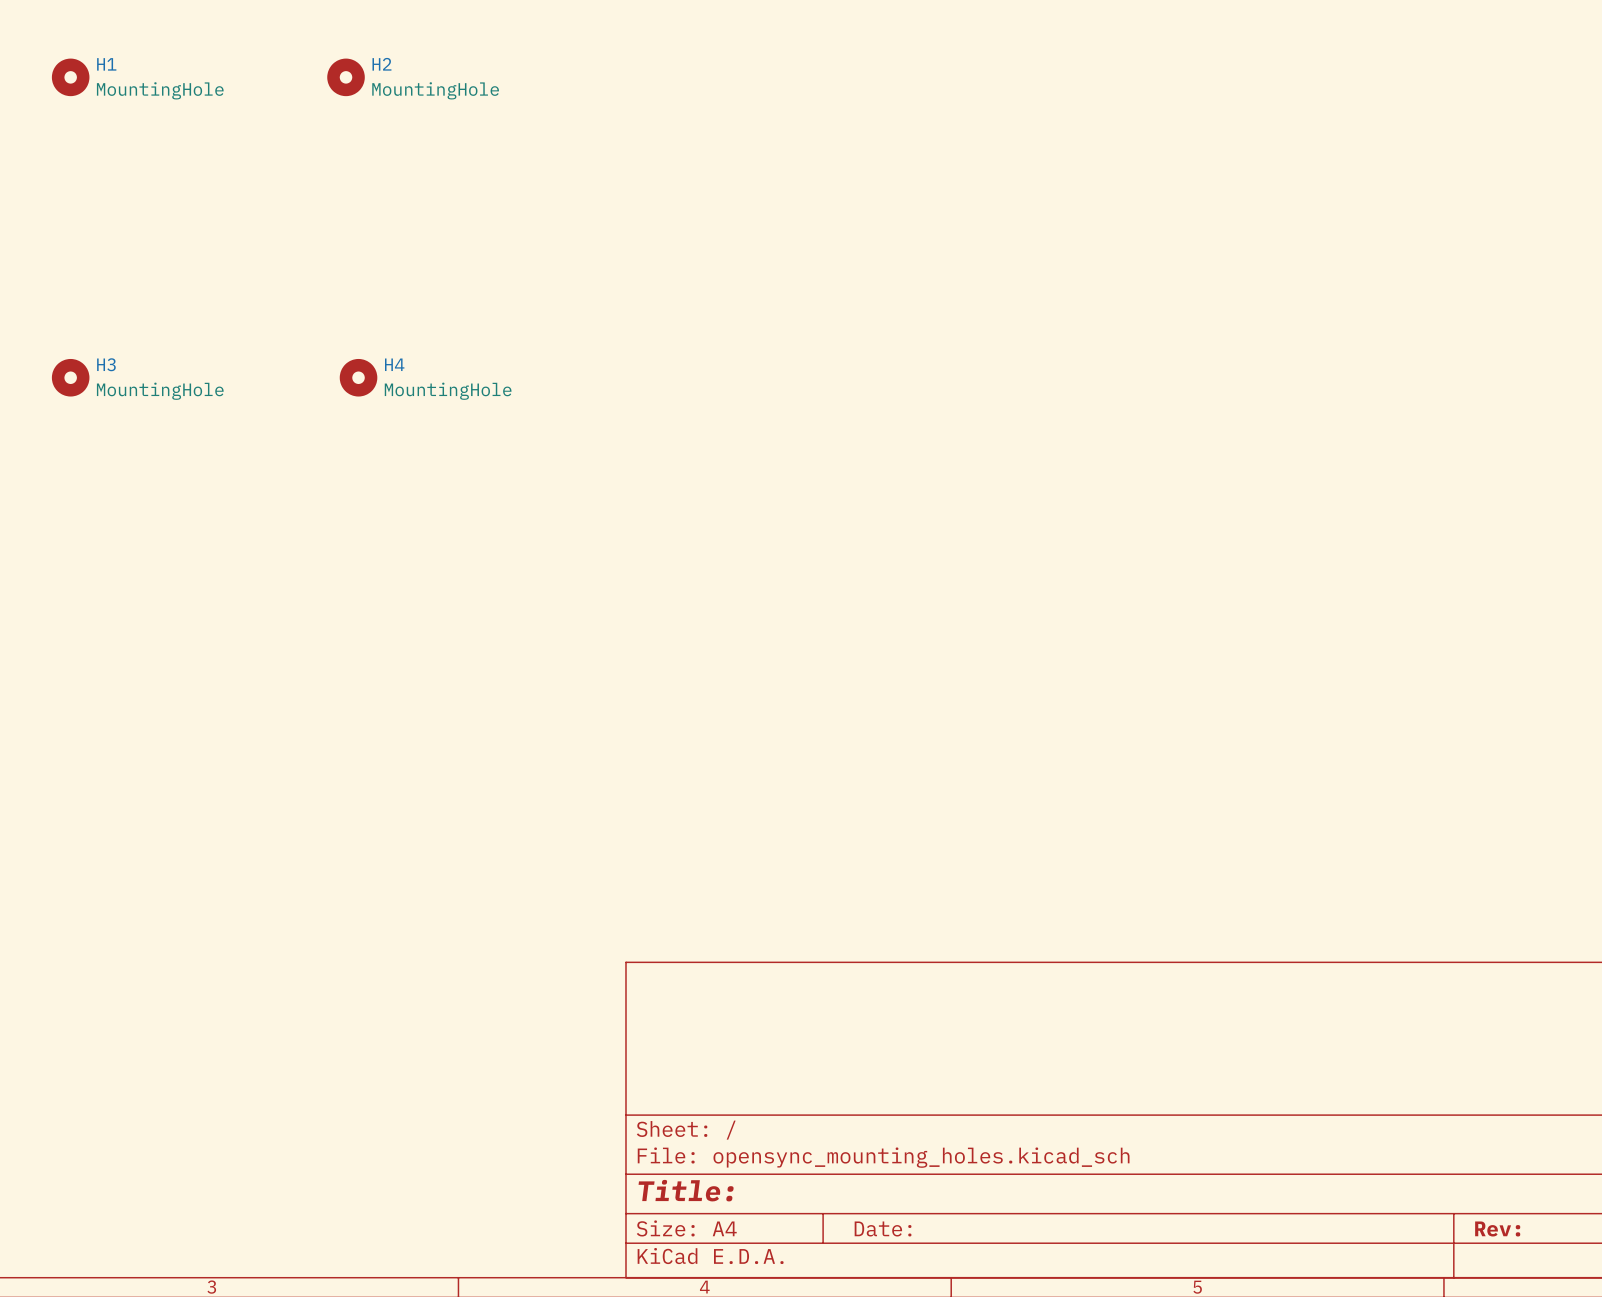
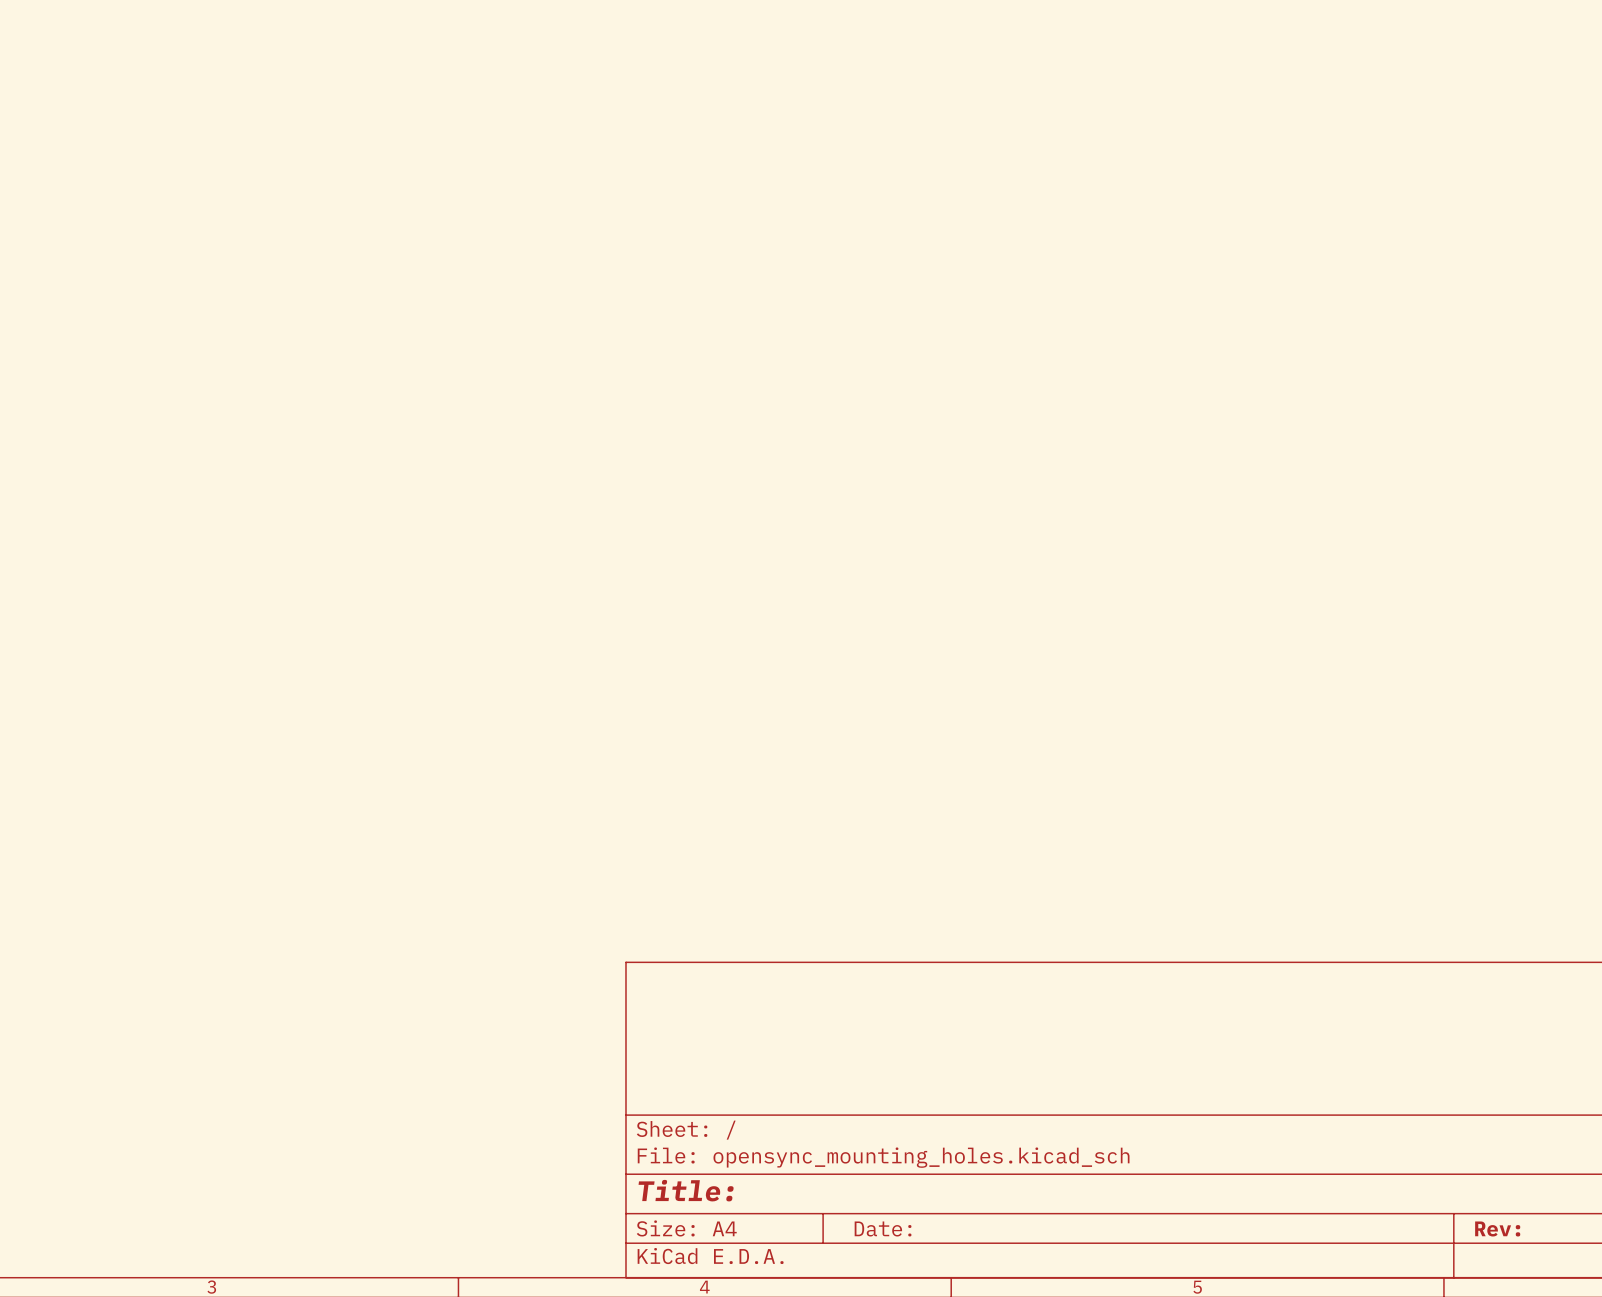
H1: MountingHole (70, 77) -> none
H2: MountingHole (346, 77) -> none
H3: MountingHole (70, 377) -> none
H4: MountingHole (358, 377) -> none

